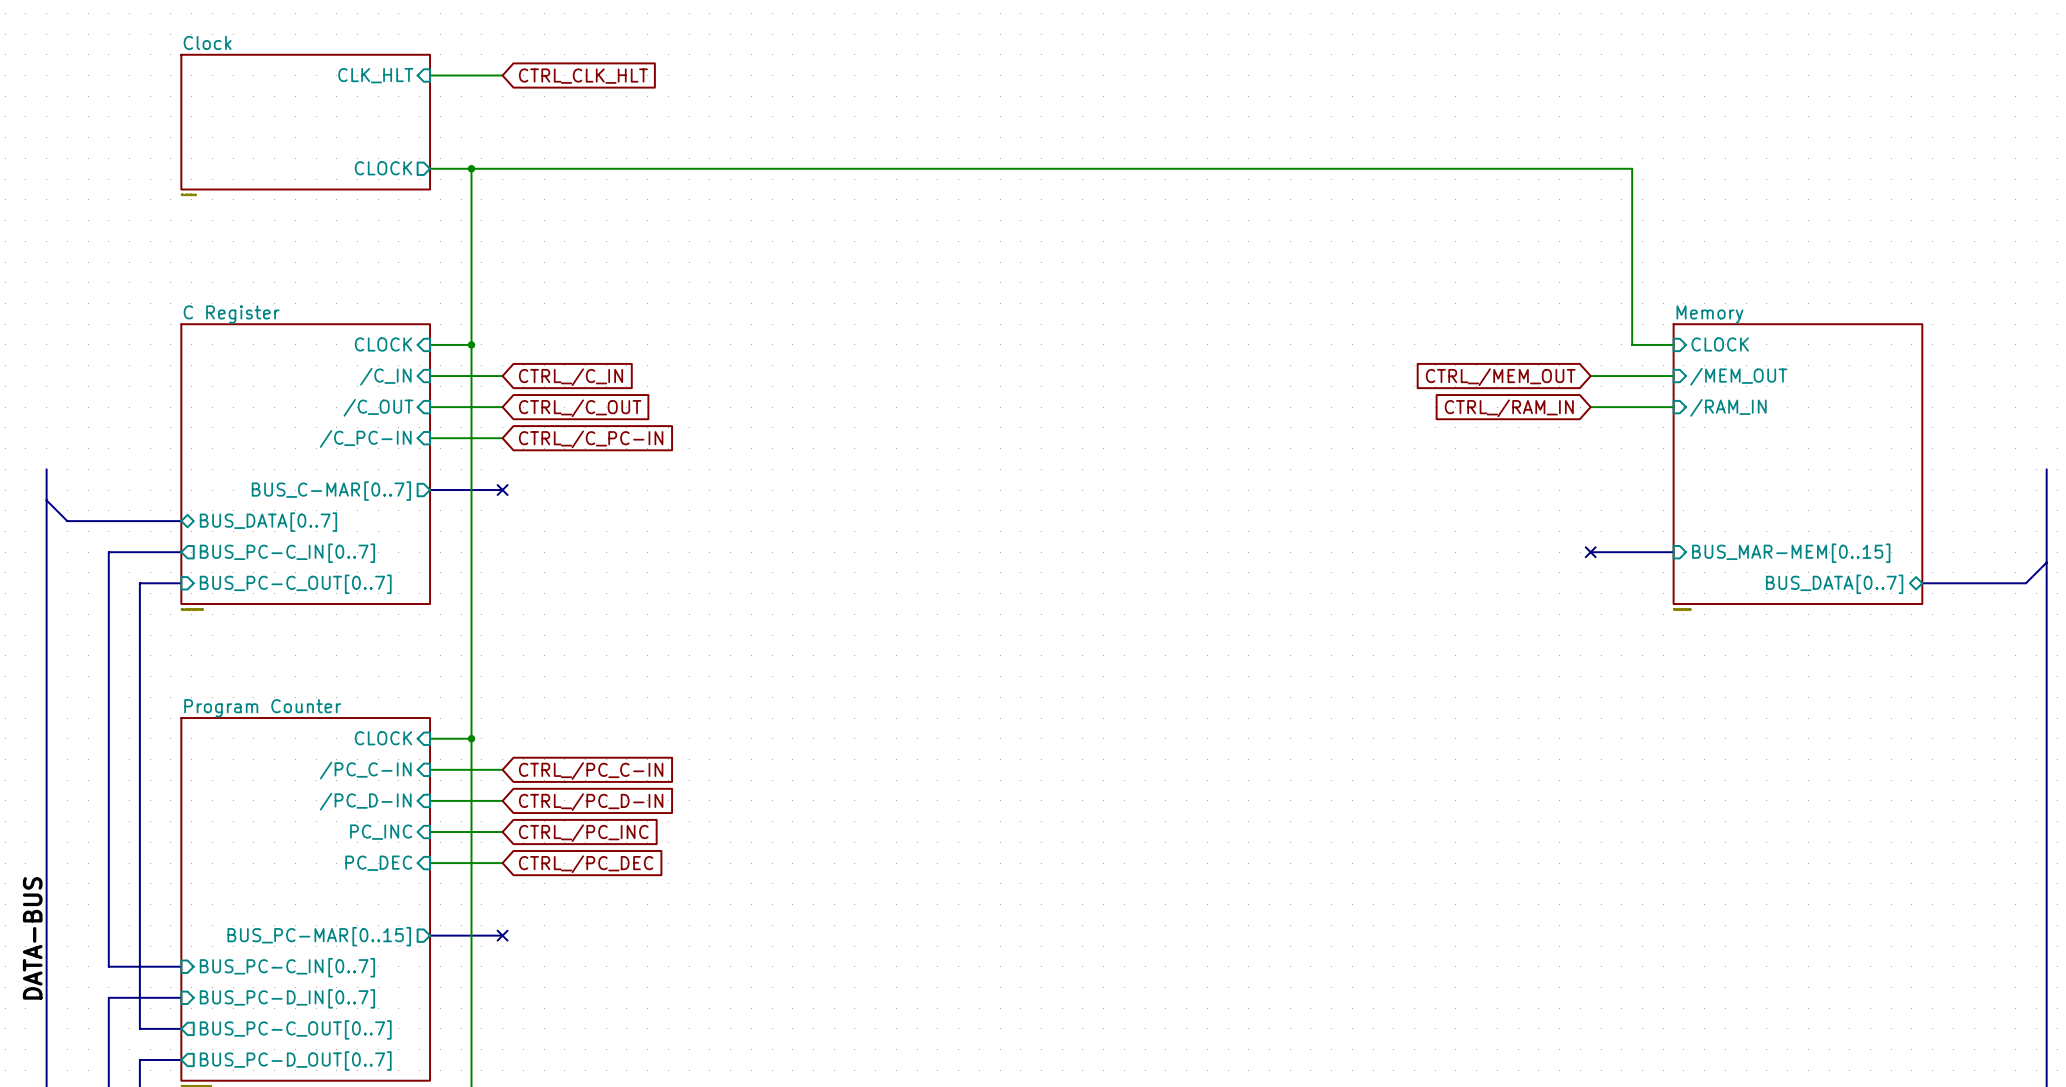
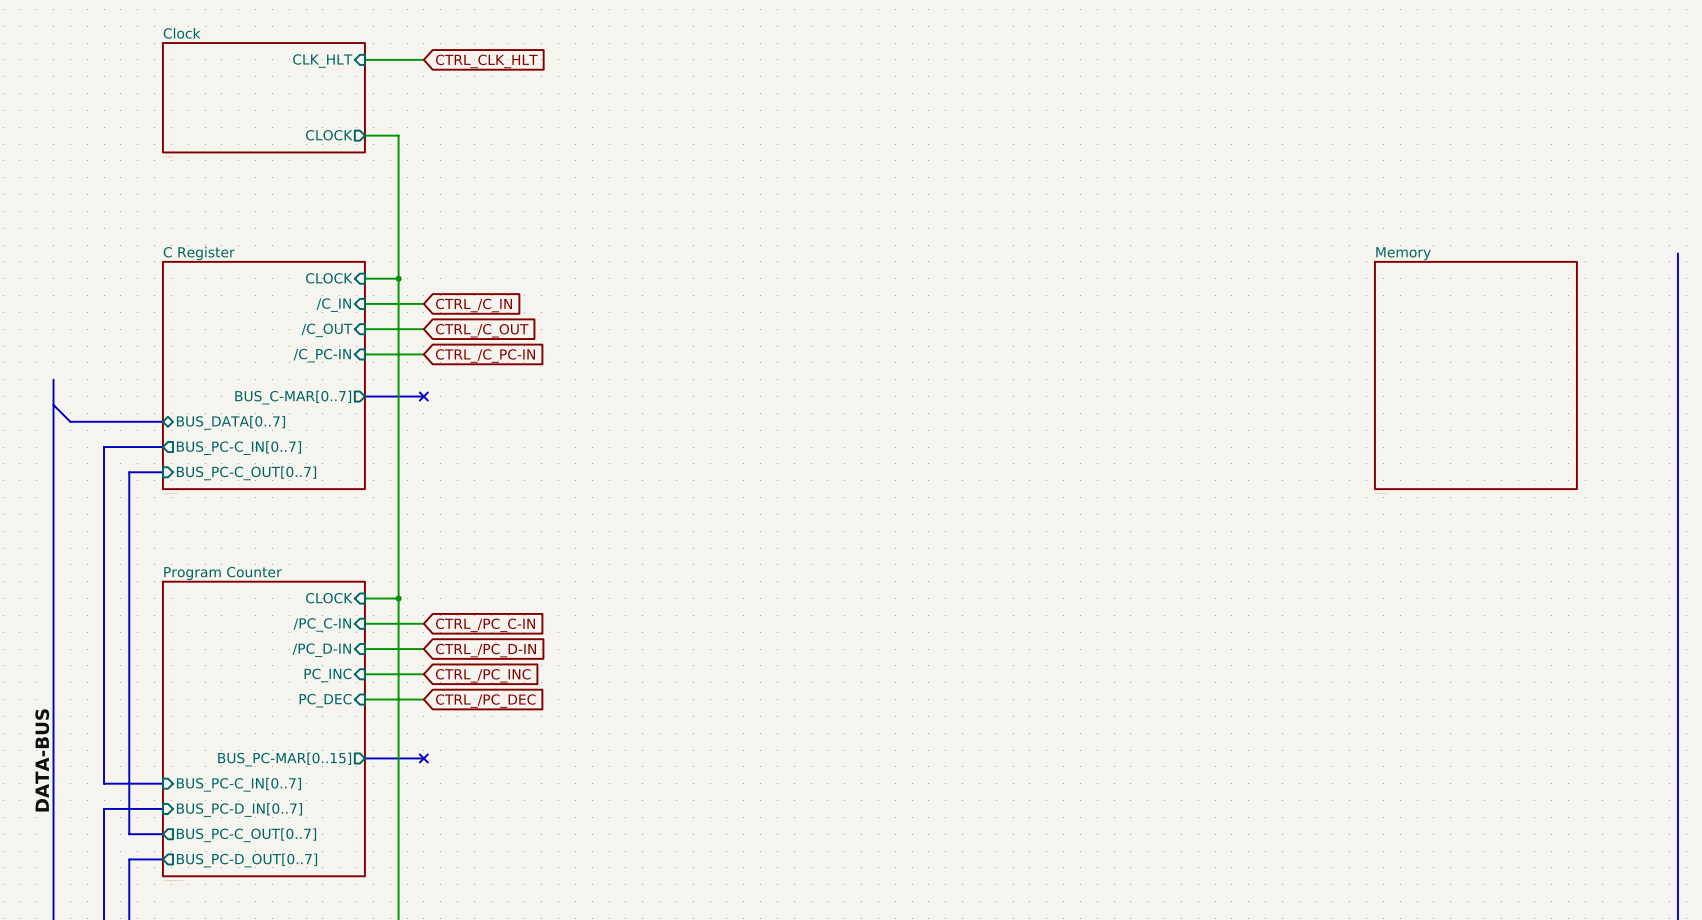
wire: (471, 168) (1632, 168) (1632, 344) (1673, 344) -> none
junction: (471, 168) -> none
bus: none -> (1677, 253) (1677, 379)
sheet pin: CLOCK (1720, 344) -> none
wire: (1590, 376) (1673, 376) -> none
sheet pin: /MEM_OUT (1738, 376) -> none
global label: CTRL_/MEM_OUT (1500, 377) -> none
wire: (1590, 407) (1673, 407) -> none
sheet pin: /RAM_IN (1728, 407) -> none
global label: CTRL_/RAM_IN (1509, 408) -> none
bus: (1590, 552) (1673, 552) -> none
no-connect mark: (1590, 552) -> none
sheet pin: BUS_MAR-MEM[0..15] (1791, 553) -> none
bus: (2046, 562) (2025, 583) (1922, 583) -> none
sheet pin: BUS_DATA[0..7] (1834, 584) -> none

